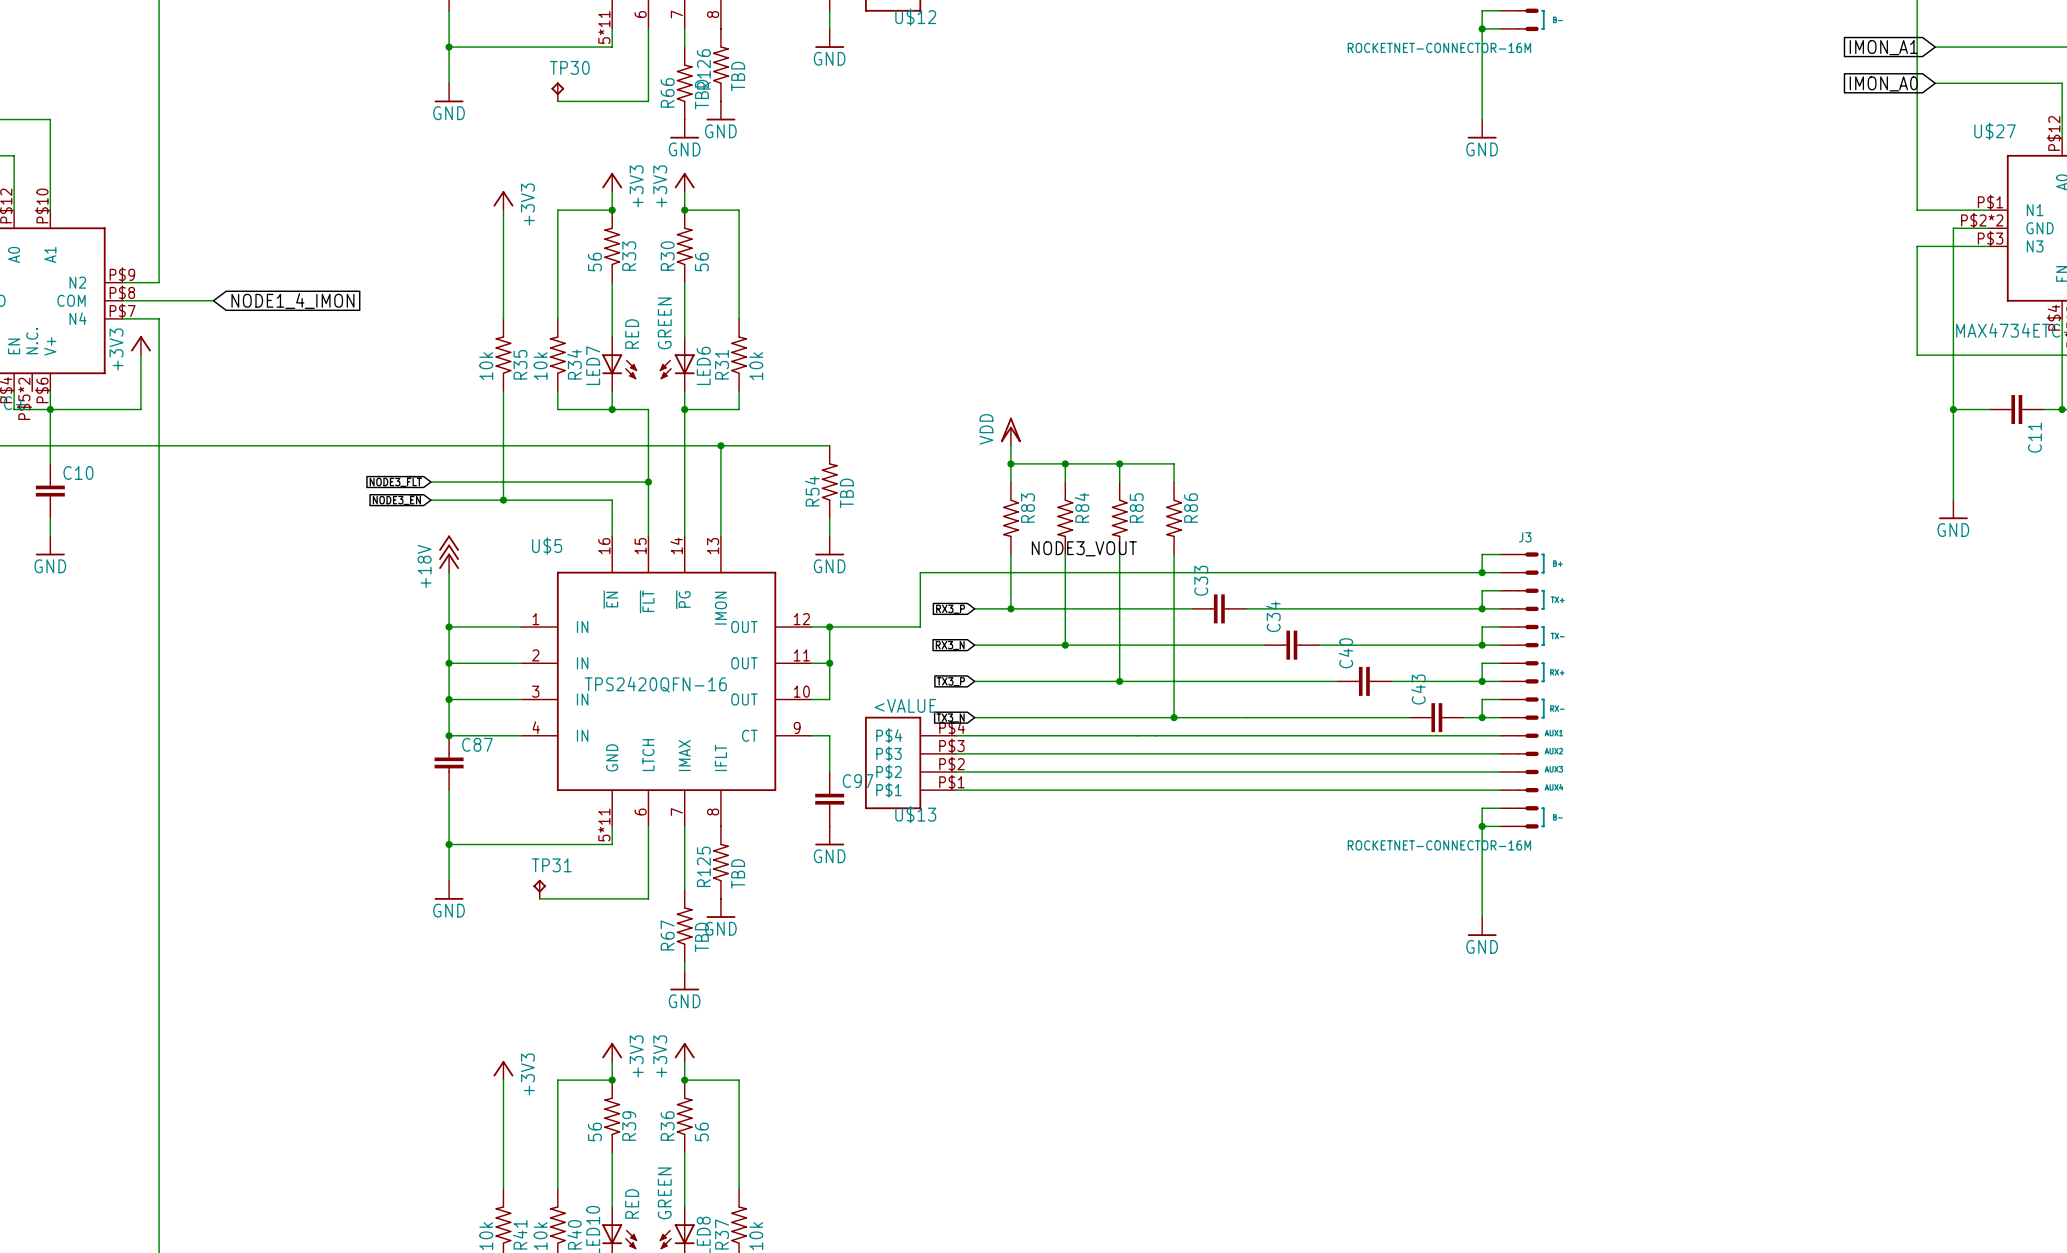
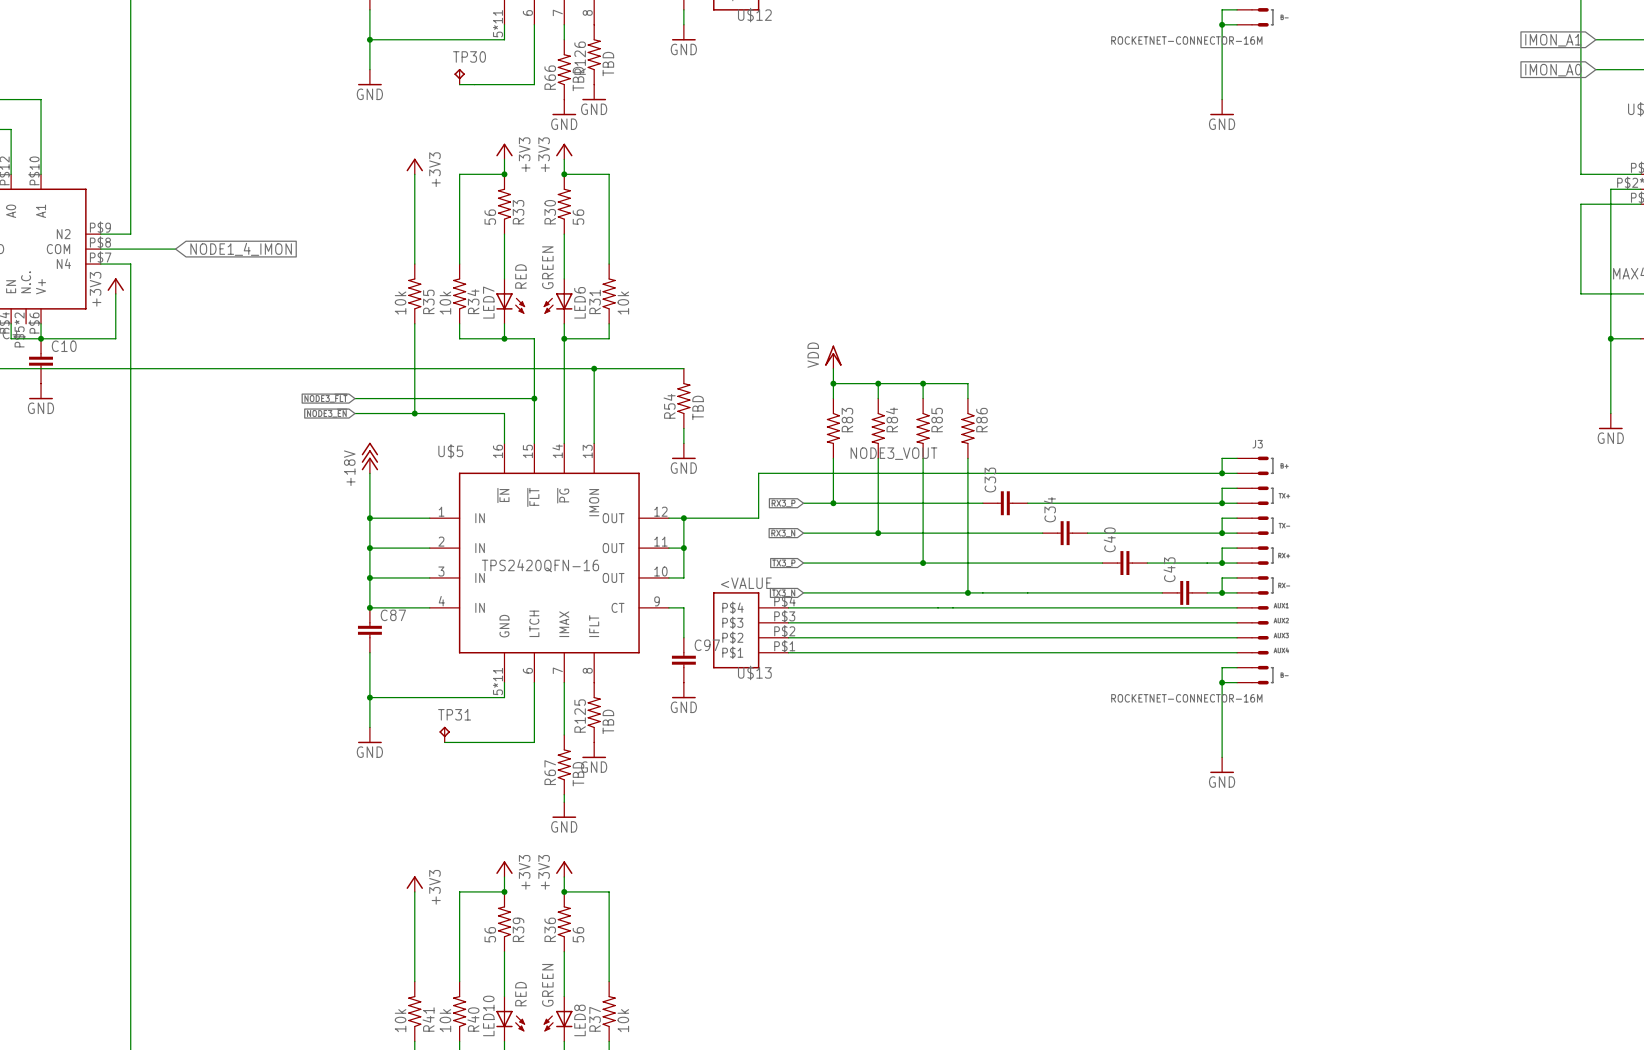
C10 position: (50, 491) -> (41, 361)
wire: (50, 518) (50, 536) -> none
power symbol position: GND (50, 545) -> GND (41, 391)

